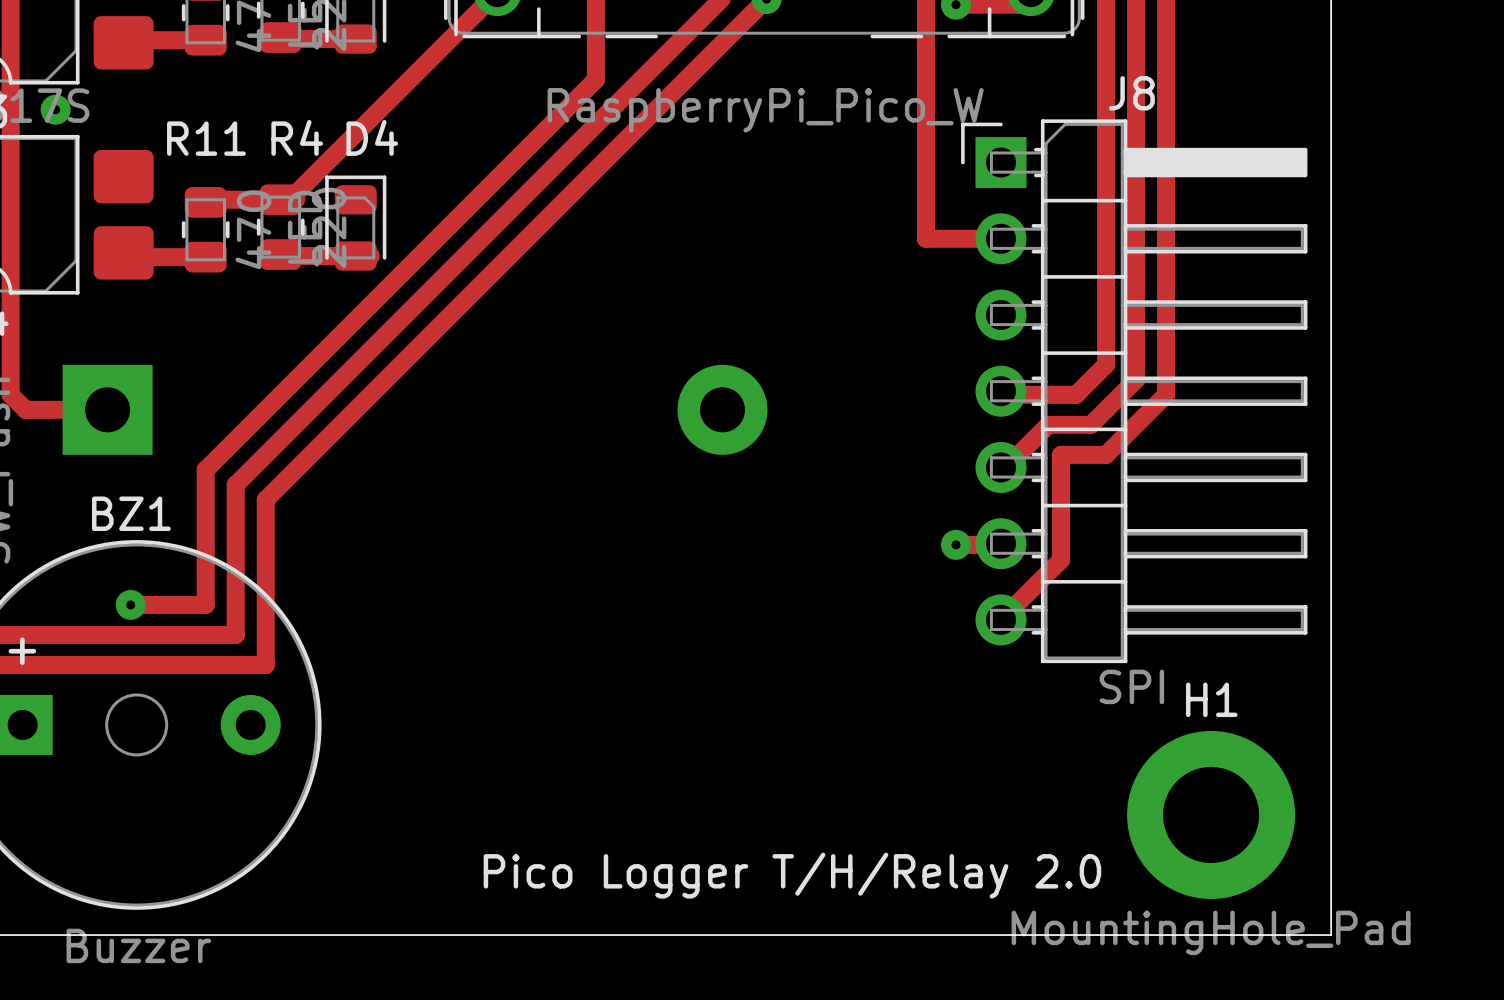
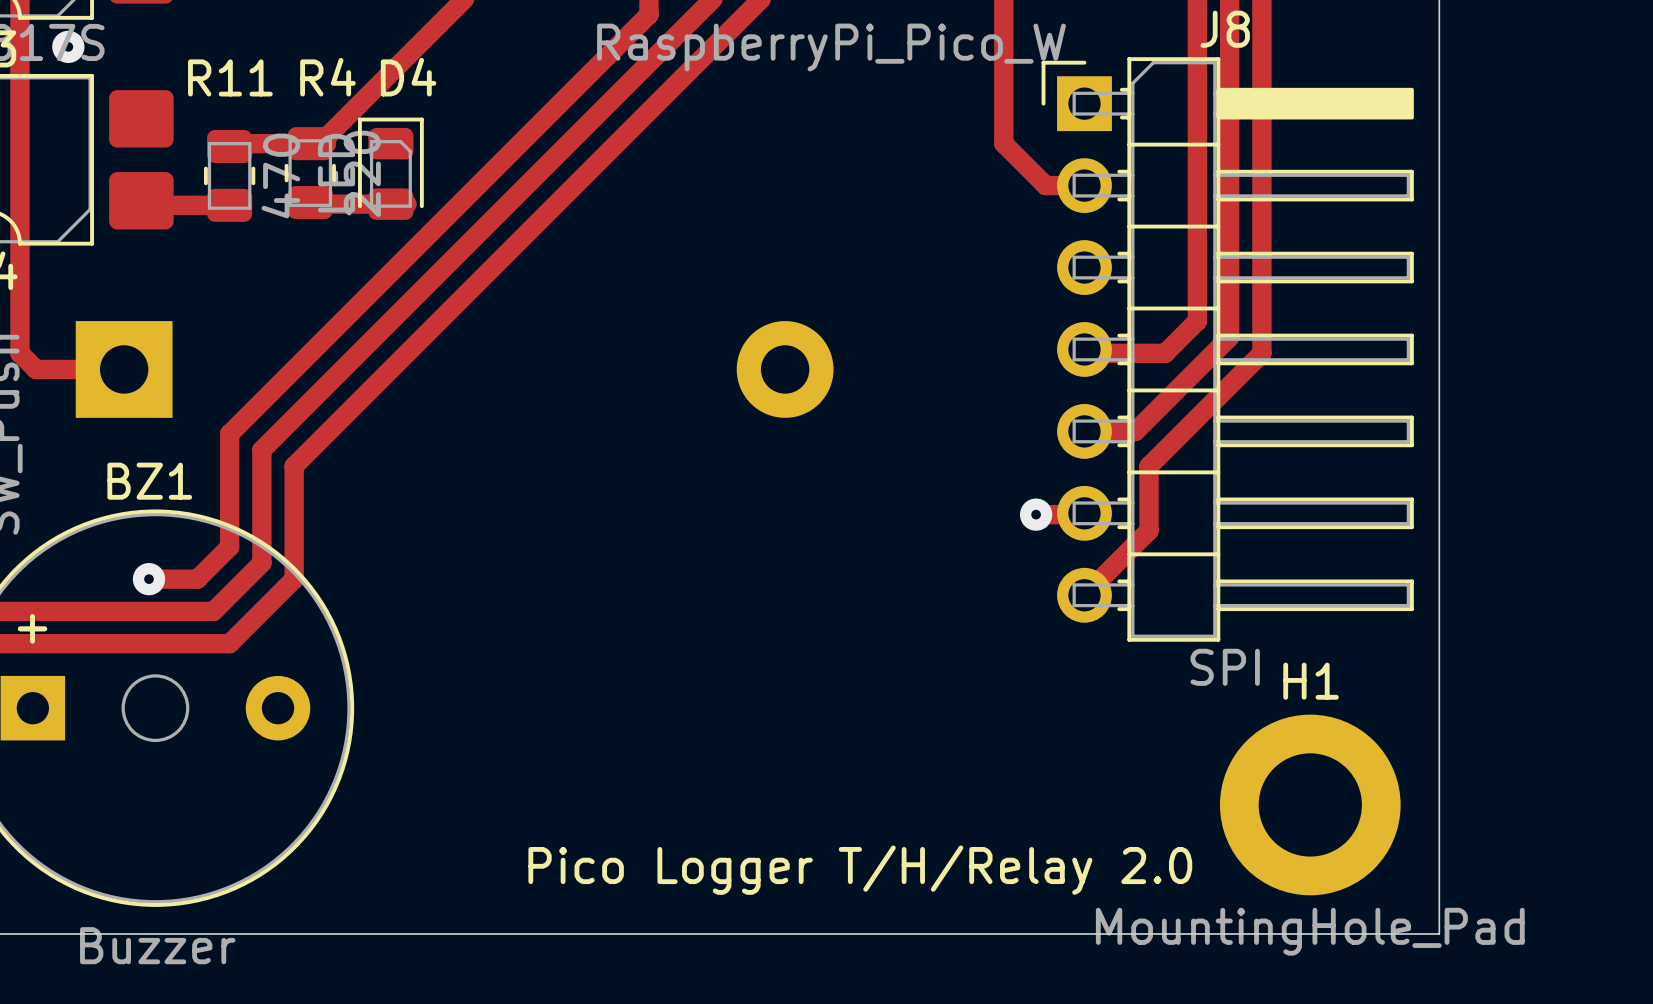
track: (925, 199) (925, 238) (964, 238) -> (1003, 143) (1045, 185)
track: (1091, 424) (1048, 424) (1005, 467) -> (1181, 385) (1135, 431) (1089, 431)
track: (1106, 454) (1061, 454) (1061, 499) -> (1197, 417) (1149, 466)
track: (205, 574) (205, 604) (175, 604) -> (229, 546) (197, 579)
track: (235, 589) (235, 634) (190, 634) -> (261, 563) (213, 611)
track: (265, 604) (265, 664) (205, 664) -> (294, 579) (229, 643)

